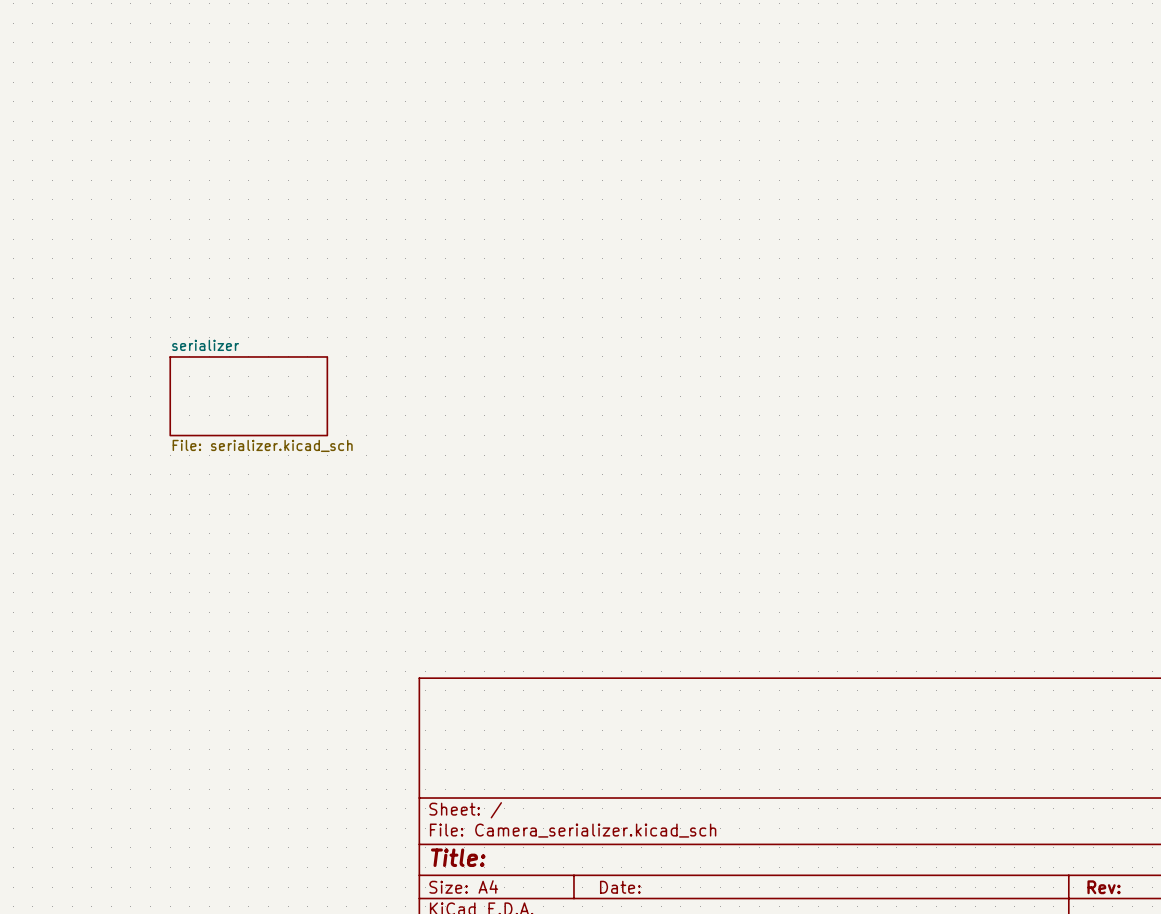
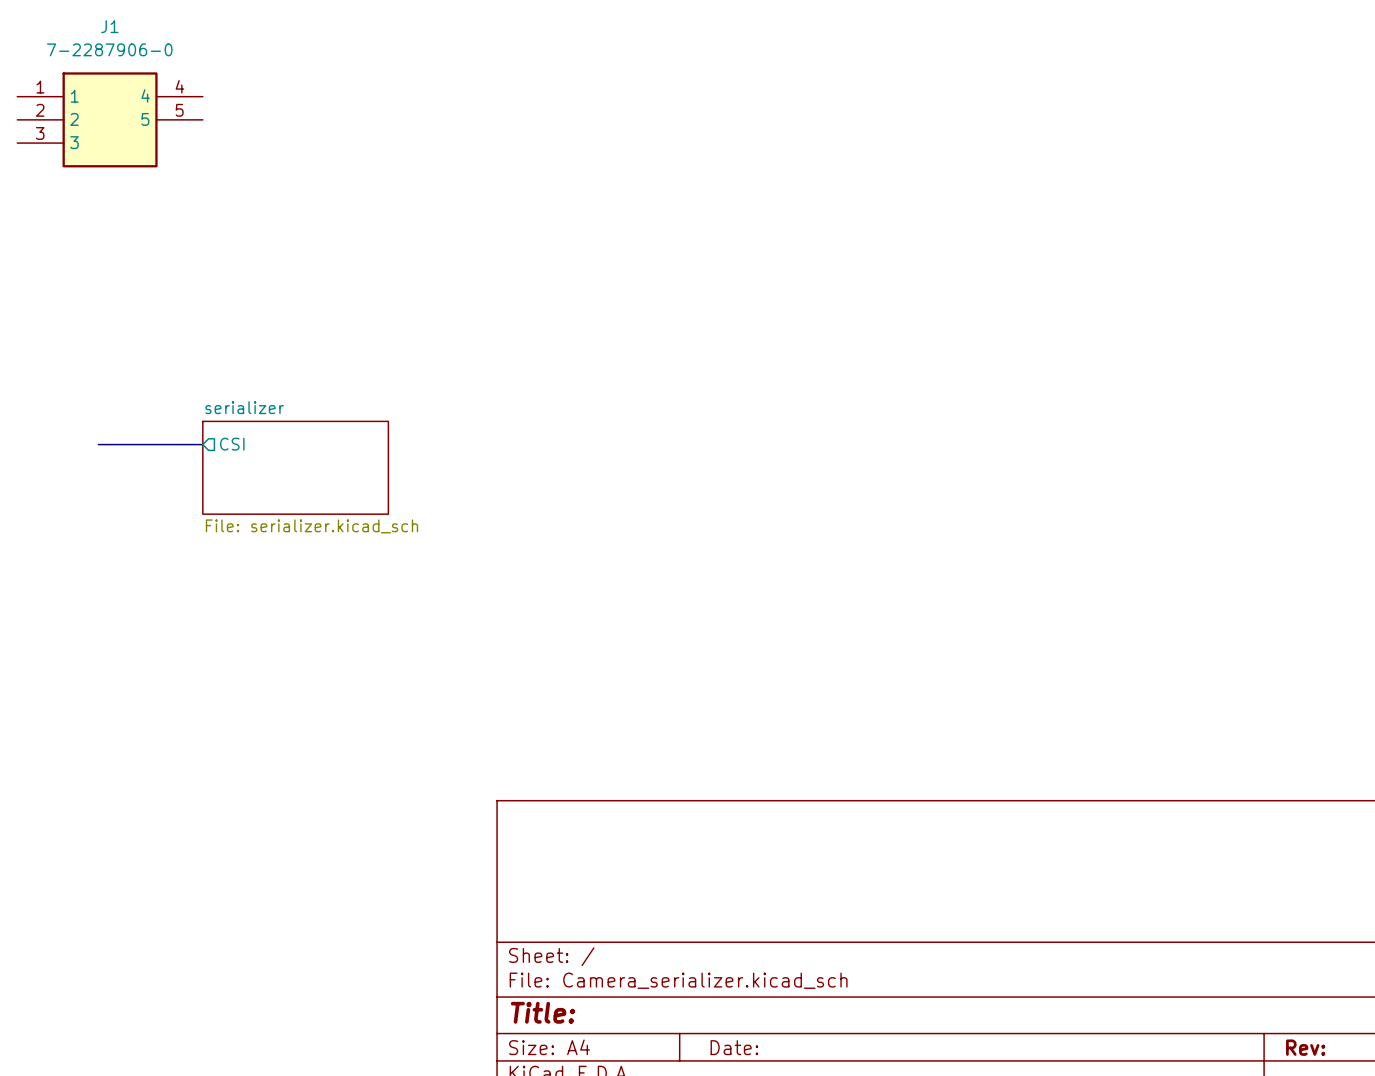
J1: none -> 7-2287906-0 (110, 119)
bus: none -> (98, 444) (202, 444)
sheet pin: none -> CSI (232, 444)

